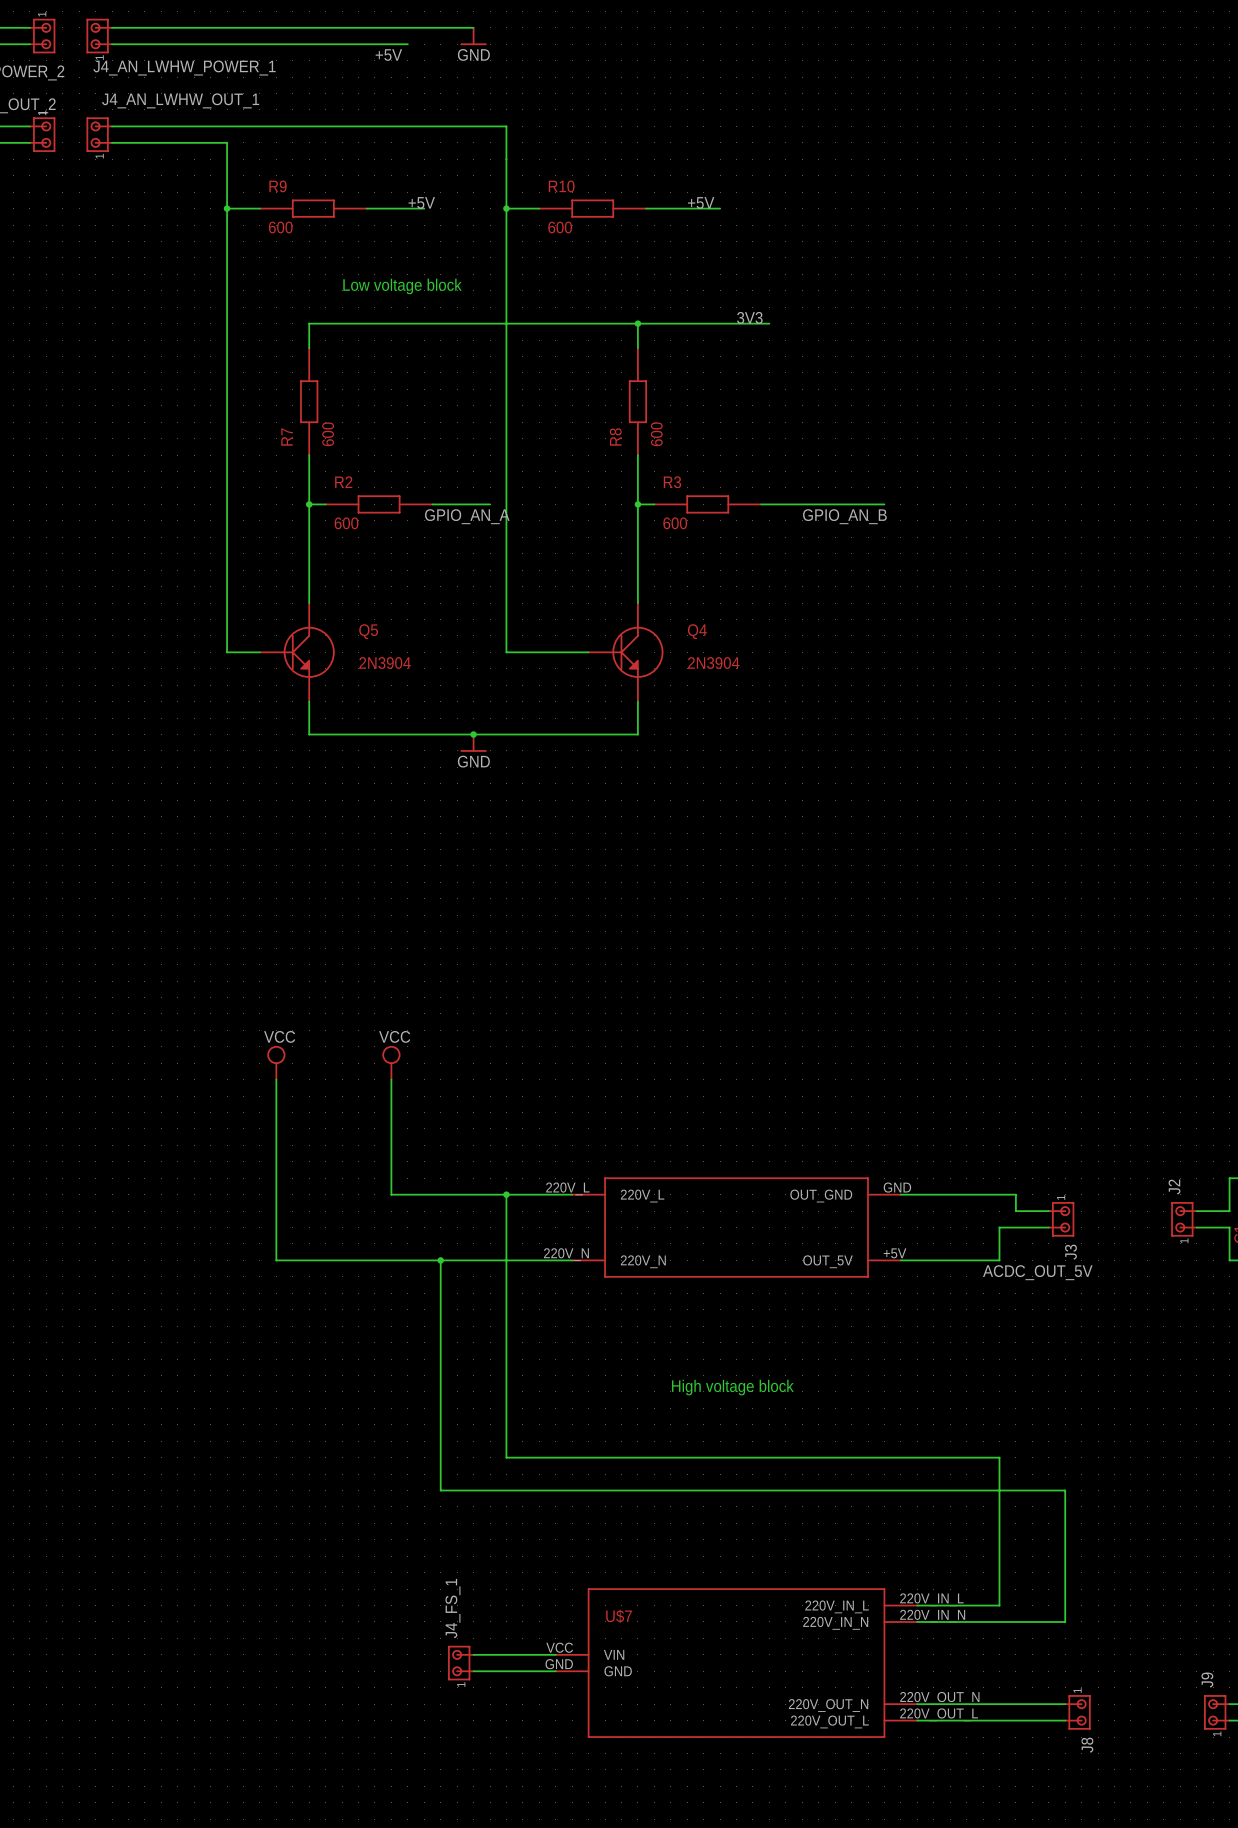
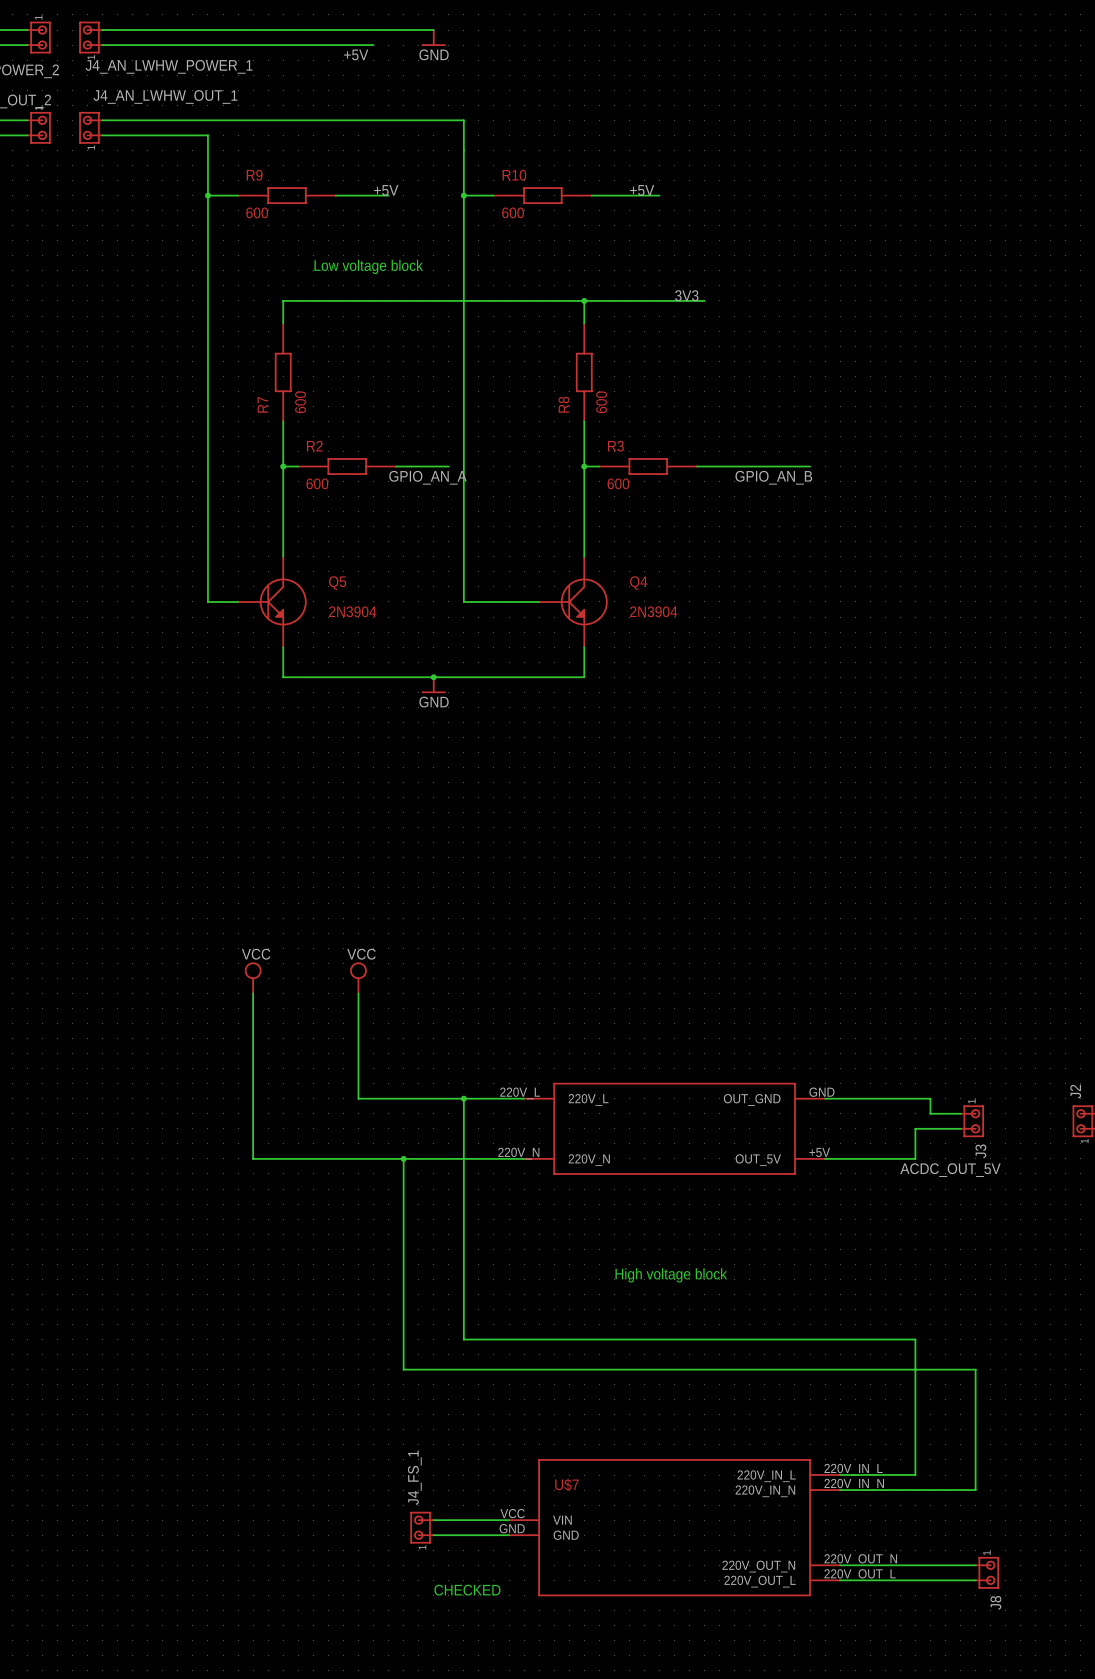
text: none -> CHECKED (467, 1590)

